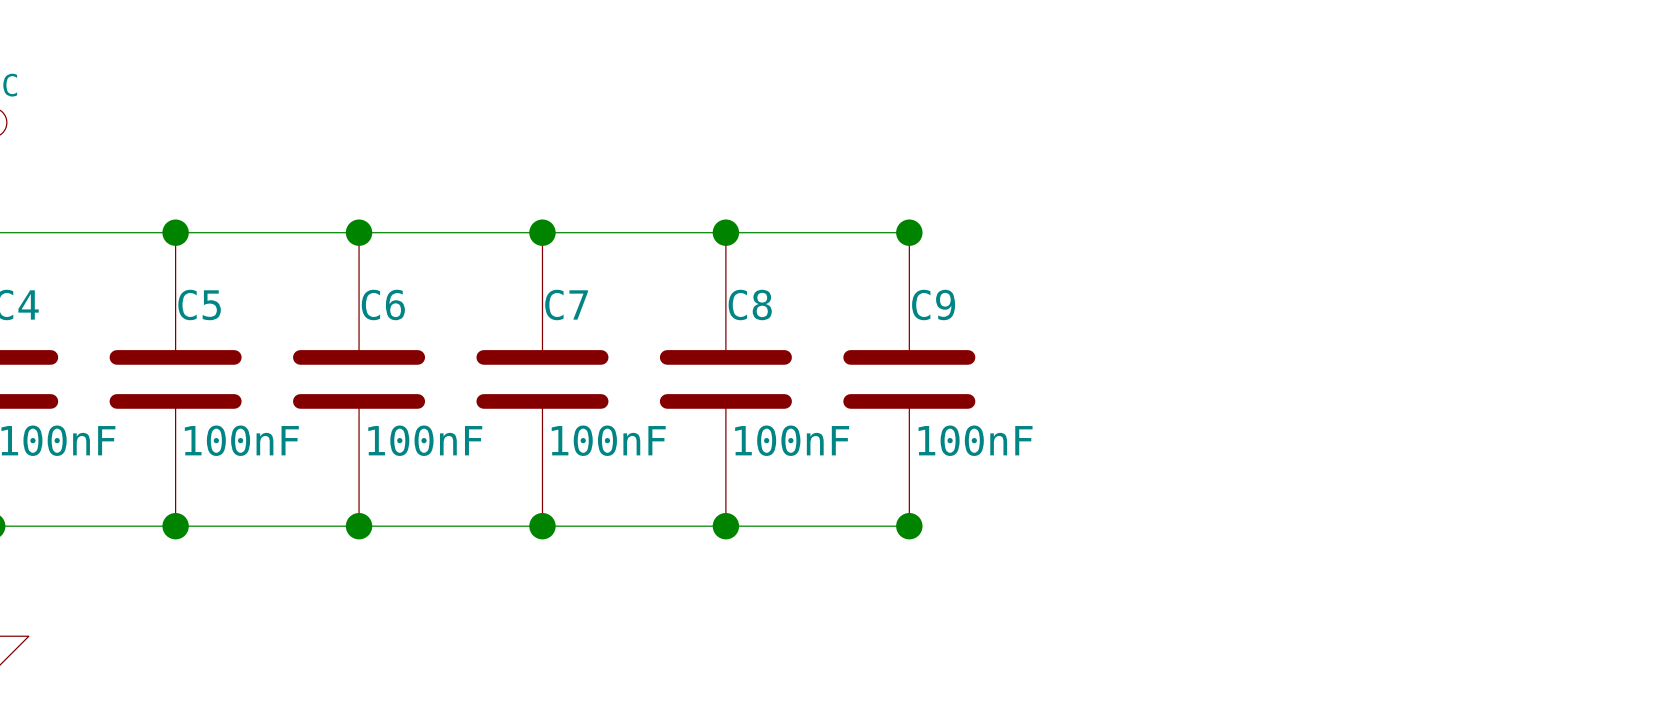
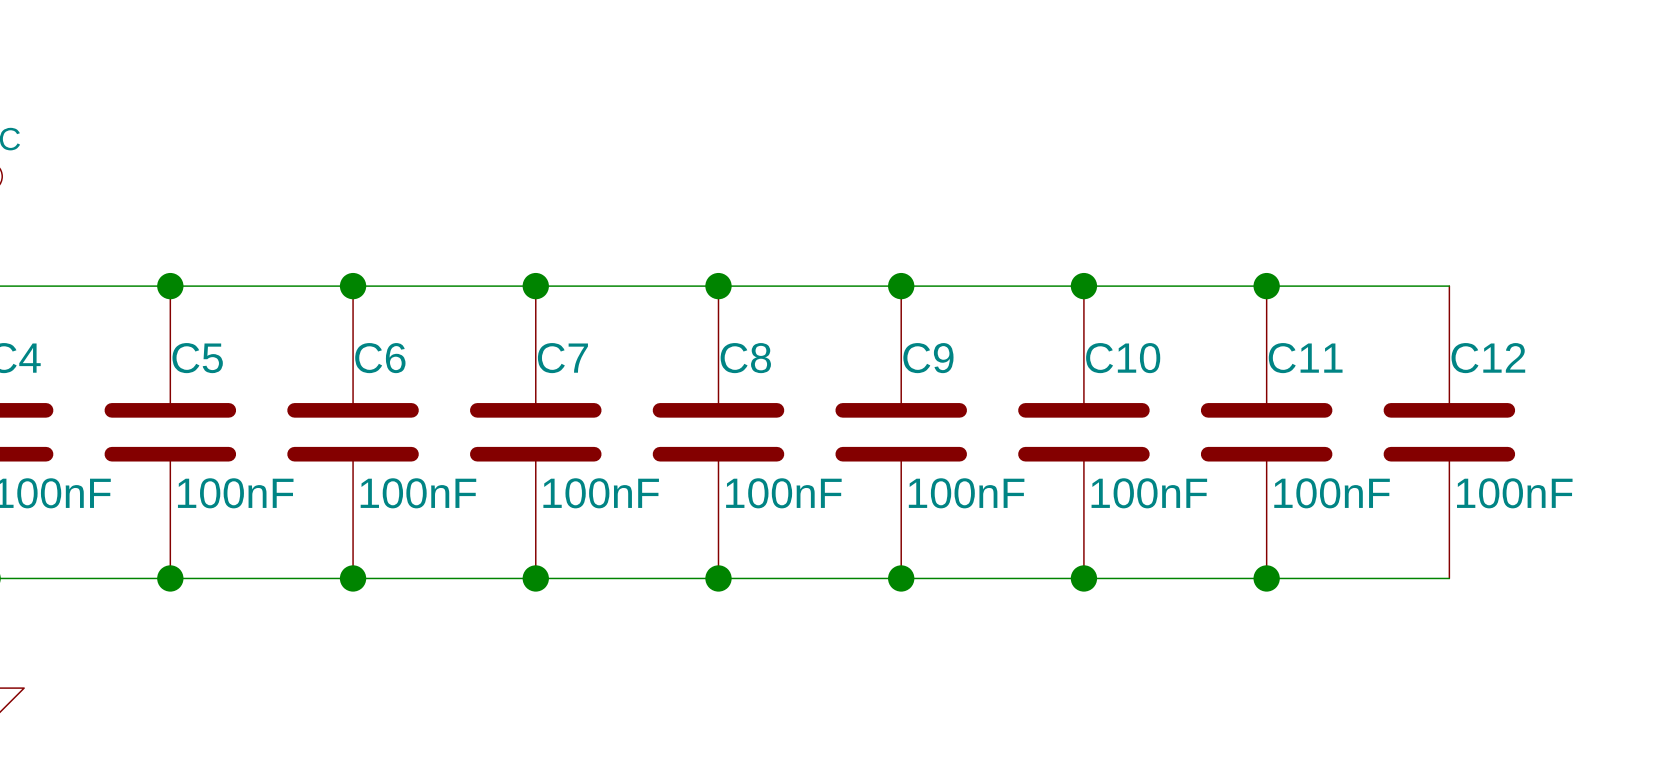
wire: none -> (901, 286) (1449, 286)
junction: none -> (1083, 286)
junction: none -> (1266, 286)
C10: none -> 100nF (1083, 432)
C11: none -> 100nF (1266, 432)
C12: none -> 100nF (1449, 432)
wire: none -> (901, 578) (1449, 578)
junction: none -> (1083, 578)
junction: none -> (1266, 578)

